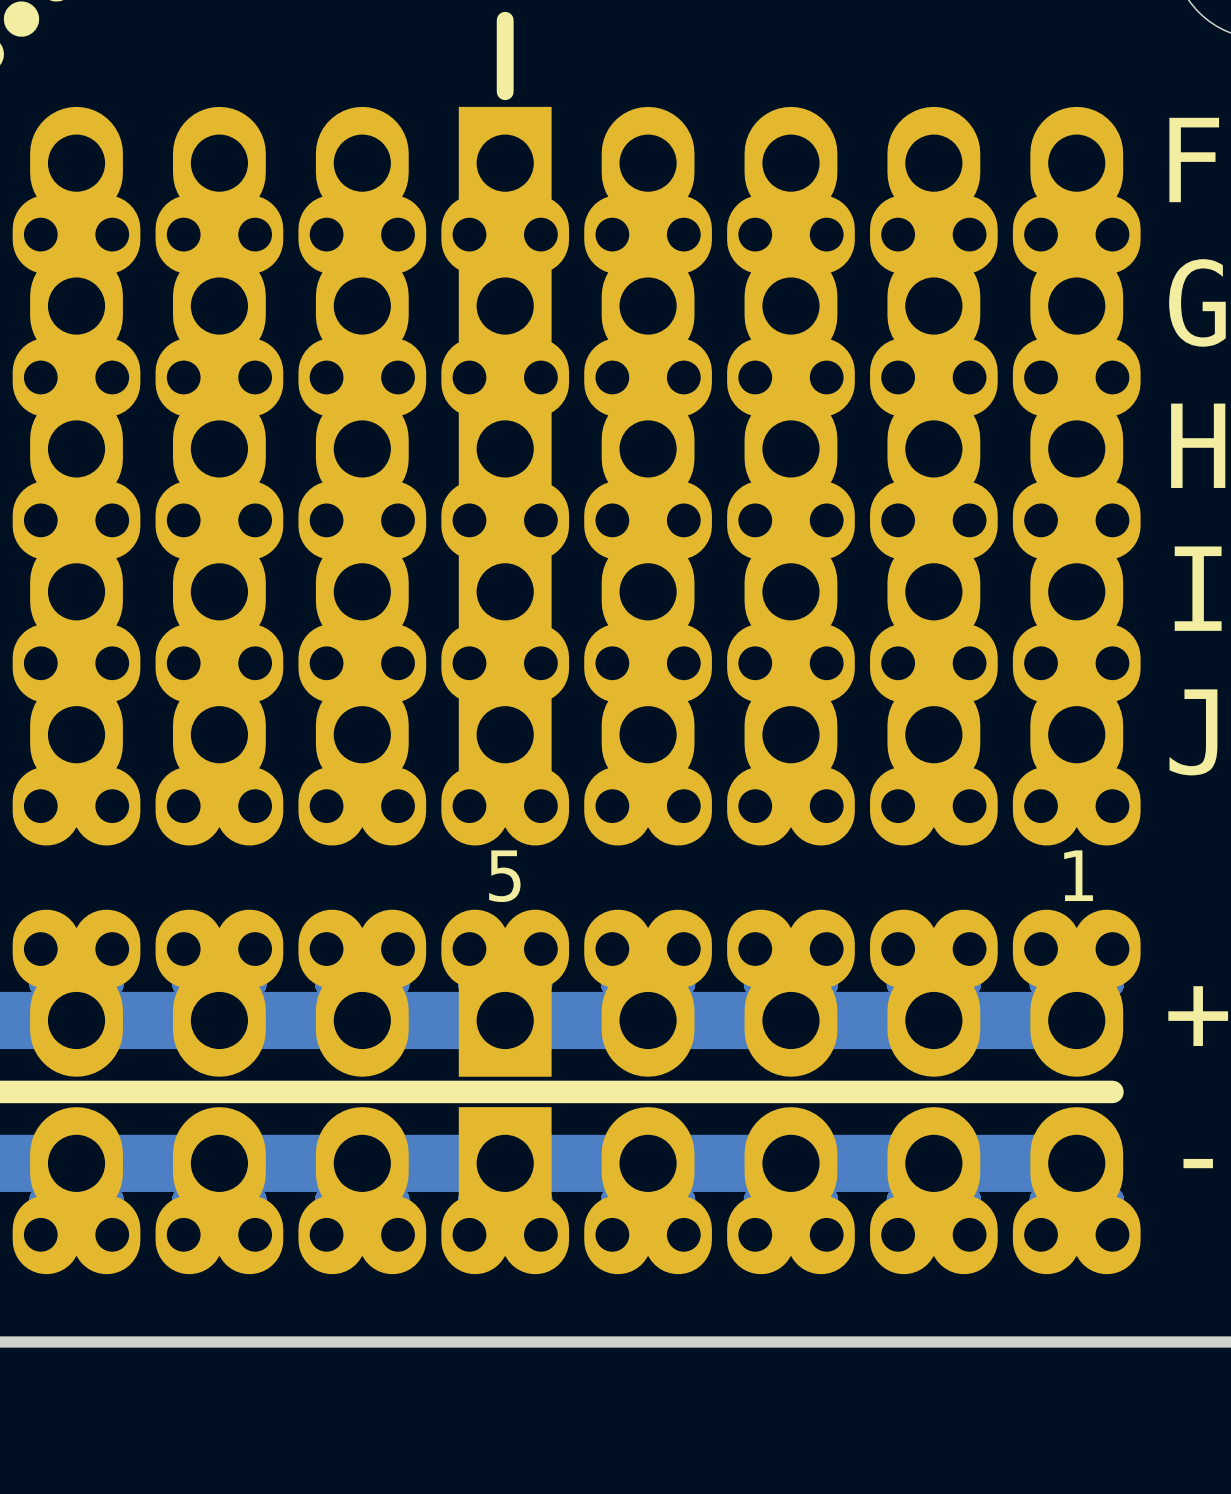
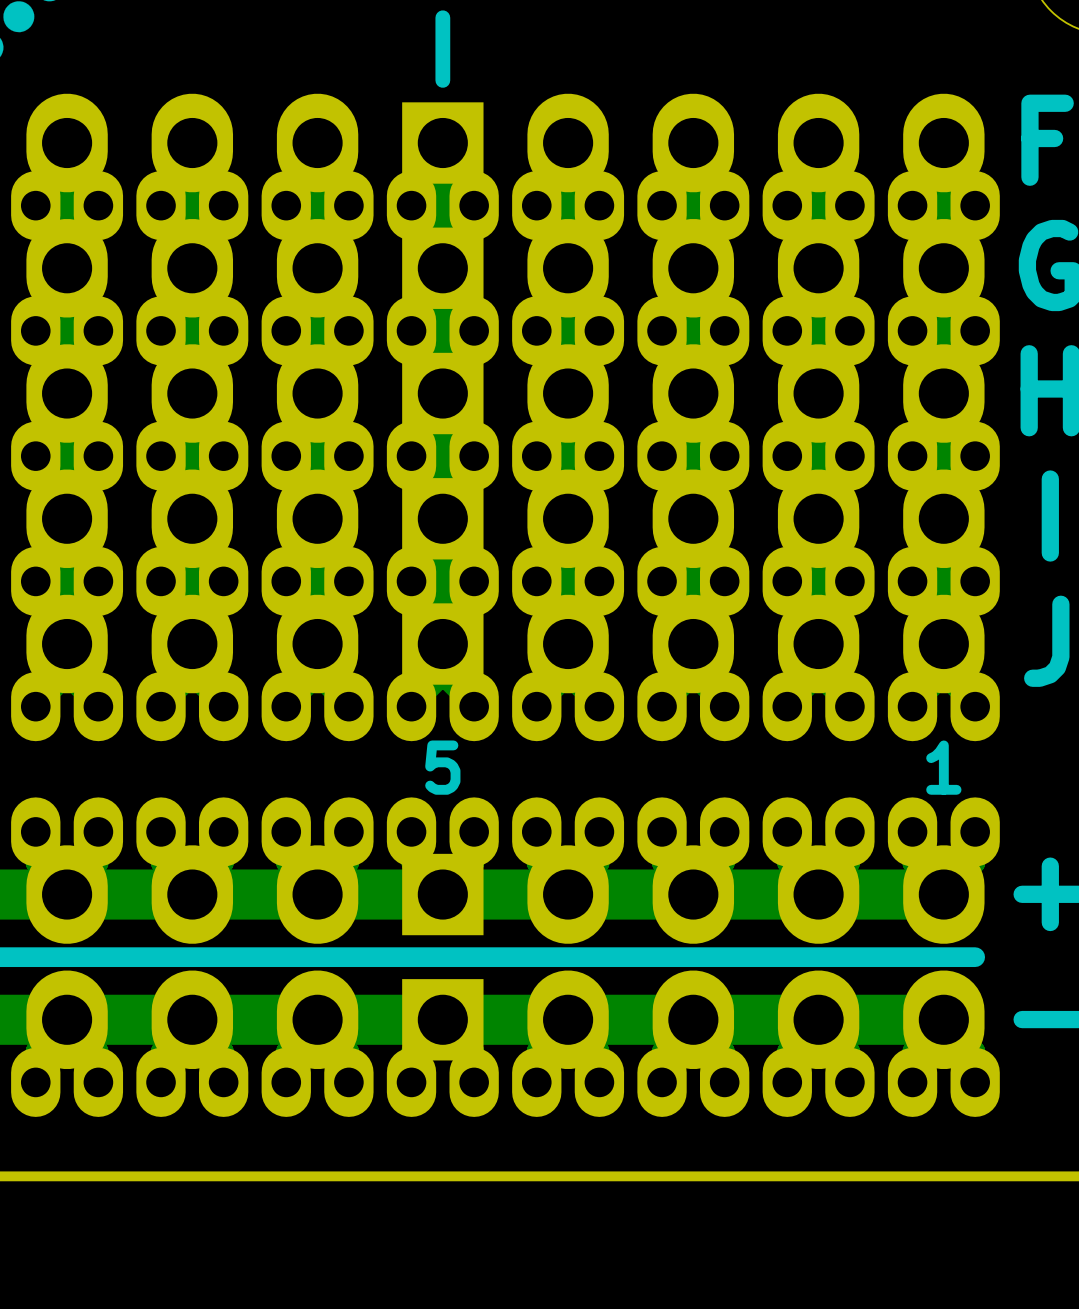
part footprint: [30, 106, 1124, 220] -> [26, 93, 985, 193]
part footprint: [12, 195, 570, 274] -> [11, 171, 499, 241]
part footprint: [584, 195, 1141, 274] -> [512, 171, 1000, 241]
part footprint: [30, 249, 1124, 363] -> [26, 218, 985, 318]
part footprint: [12, 338, 570, 417] -> [11, 296, 499, 366]
part footprint: [584, 338, 1141, 417] -> [512, 296, 1000, 366]
part footprint: [30, 392, 1124, 506] -> [26, 344, 985, 443]
part footprint: [12, 480, 570, 560] -> [11, 421, 499, 491]
part footprint: [584, 480, 1141, 560] -> [512, 421, 1000, 491]
part footprint: [30, 535, 1124, 649] -> [26, 469, 985, 569]
part footprint: [12, 623, 570, 703] -> [11, 546, 499, 616]
part footprint: [584, 623, 1141, 703] -> [512, 546, 1000, 616]
part footprint: [30, 678, 1124, 791] -> [26, 594, 985, 694]
part footprint: [12, 766, 570, 846] -> [11, 672, 499, 742]
part footprint: [584, 766, 1141, 846] -> [512, 672, 1000, 742]
part footprint: [12, 909, 570, 989] -> [11, 797, 499, 867]
part footprint: [584, 909, 1141, 989] -> [512, 797, 1000, 867]
part footprint: [30, 964, 1124, 1077] -> [26, 845, 985, 944]
part footprint: [30, 1107, 1124, 1220] -> [26, 970, 985, 1070]
part footprint: [12, 1195, 570, 1275] -> [11, 1047, 499, 1117]
part footprint: [584, 1195, 1141, 1275] -> [512, 1047, 1000, 1117]

